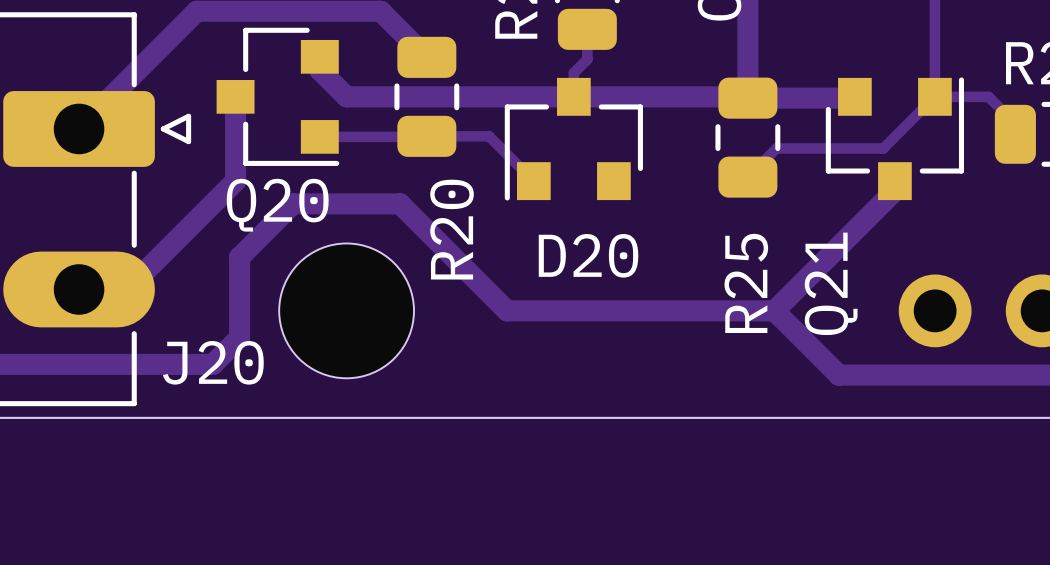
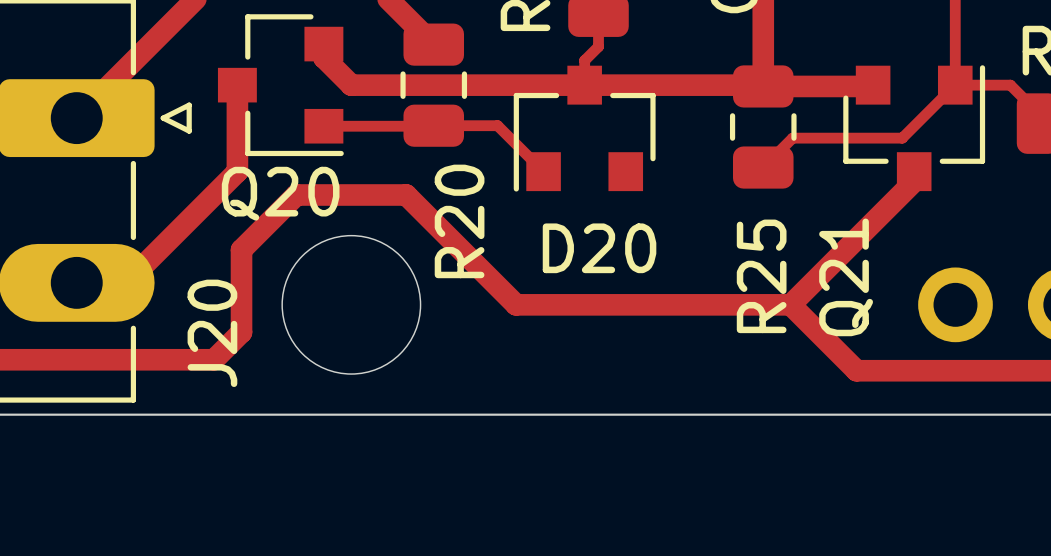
J20 name rotation: 0° (213, 362) -> 90° counterclockwise (212, 333)

